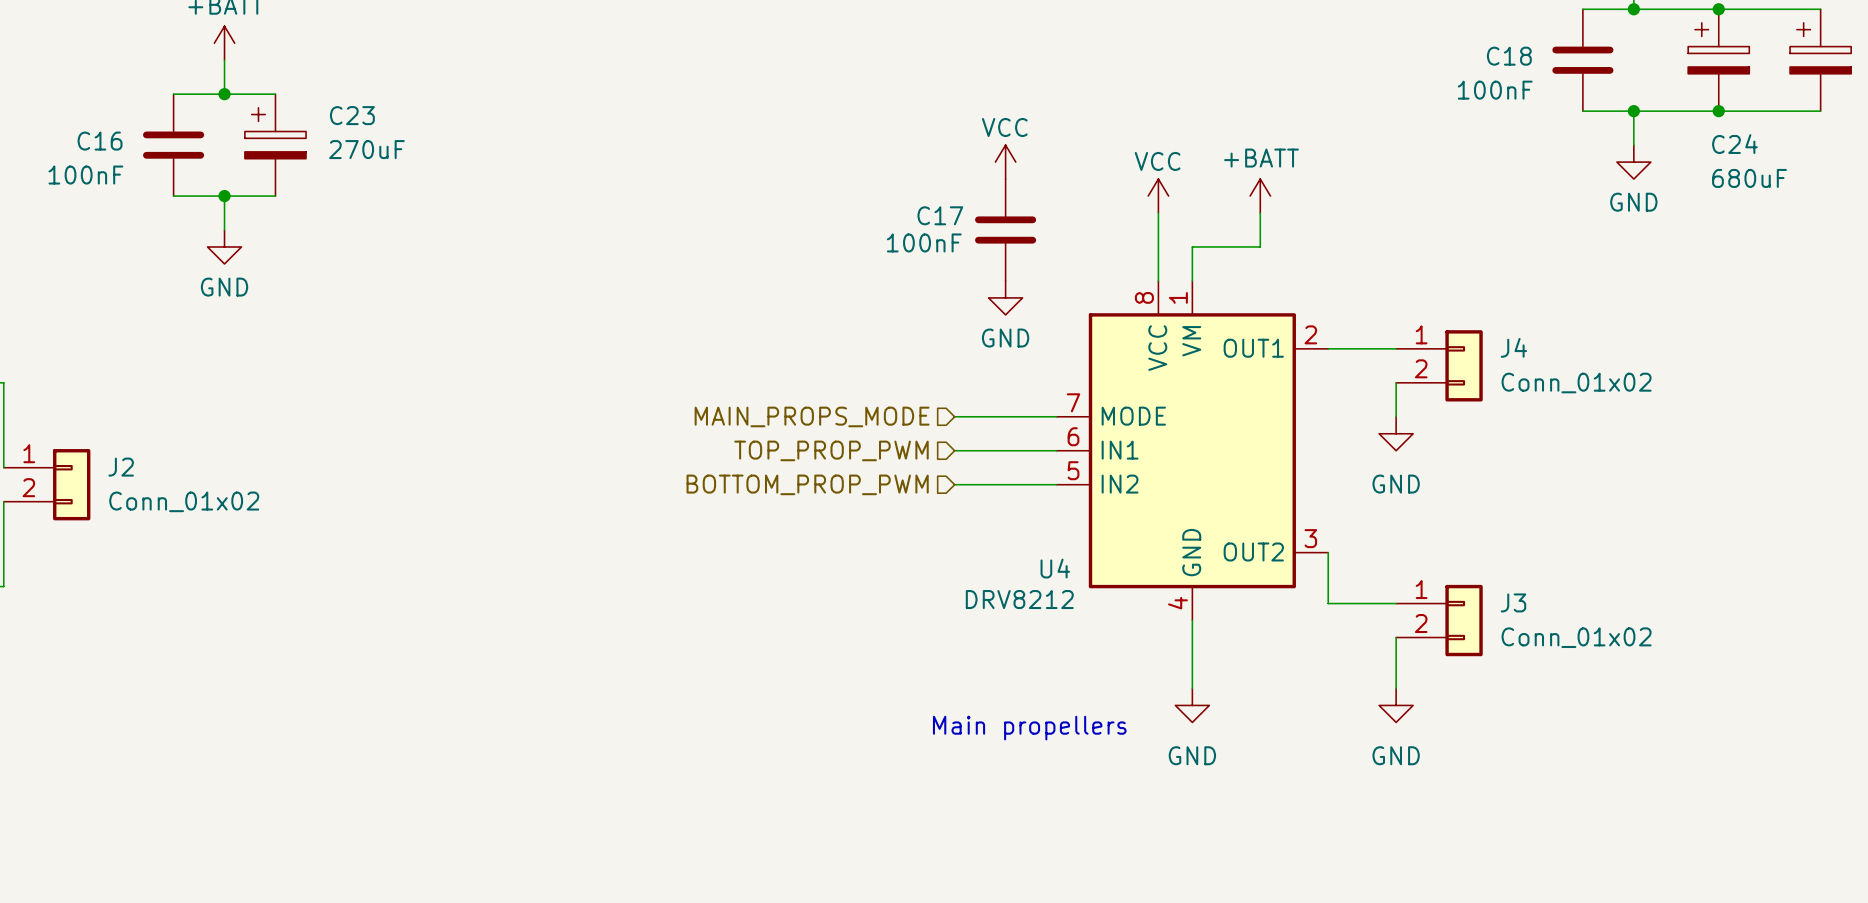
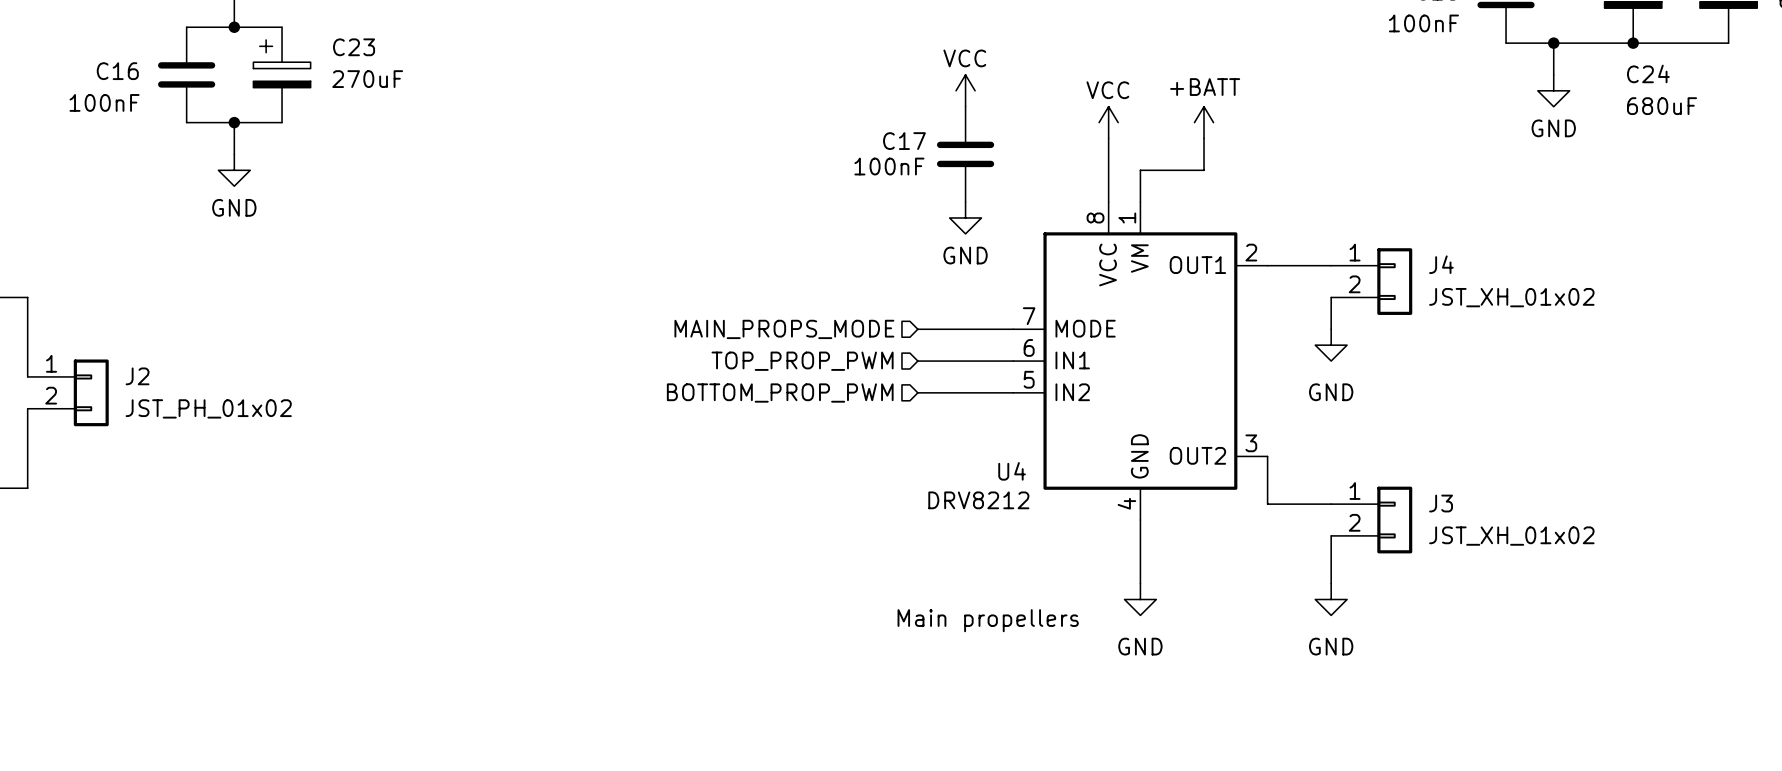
J4 value: Conn_01x02 (1576, 383) -> JST_XH_01x02 (1511, 297)
J2 value: Conn_01x02 (184, 501) -> JST_PH_01x02 (208, 408)
J3 value: Conn_01x02 (1576, 637) -> JST_XH_01x02 (1511, 536)

